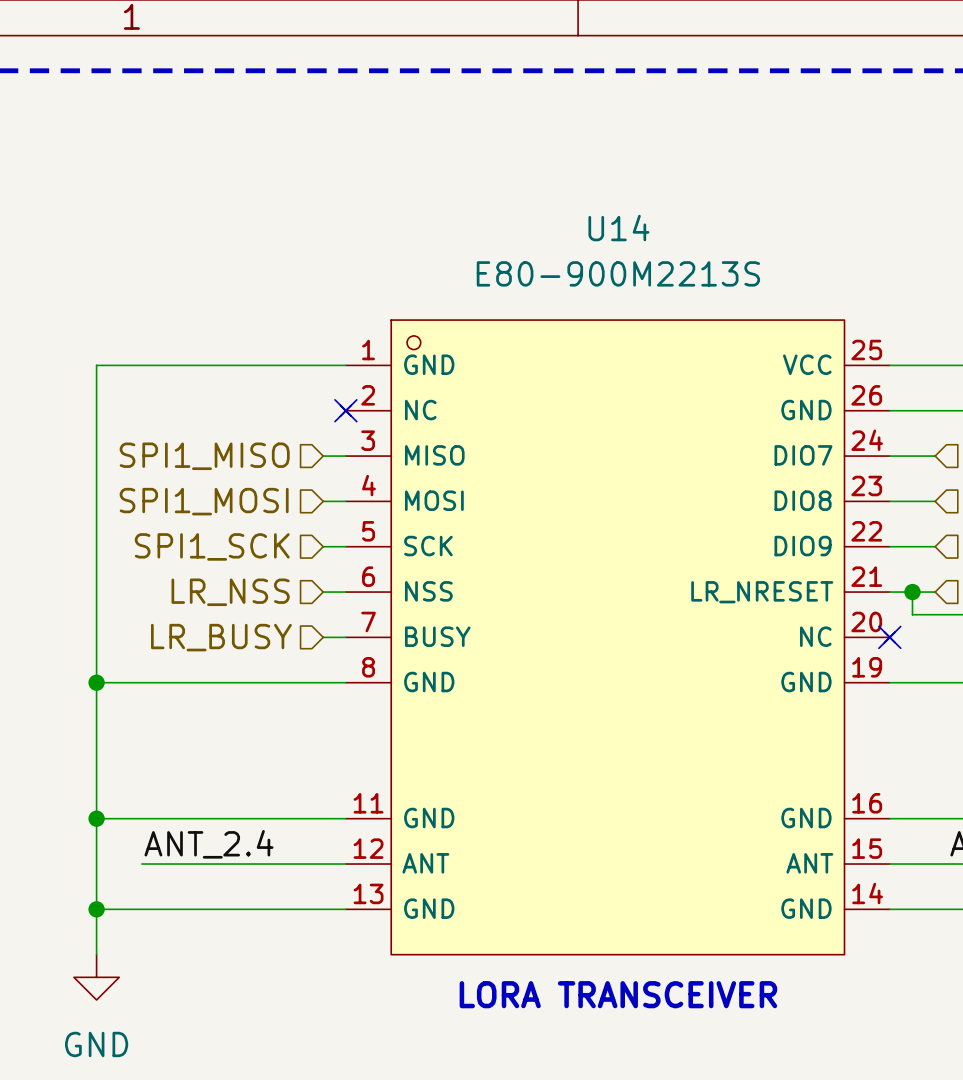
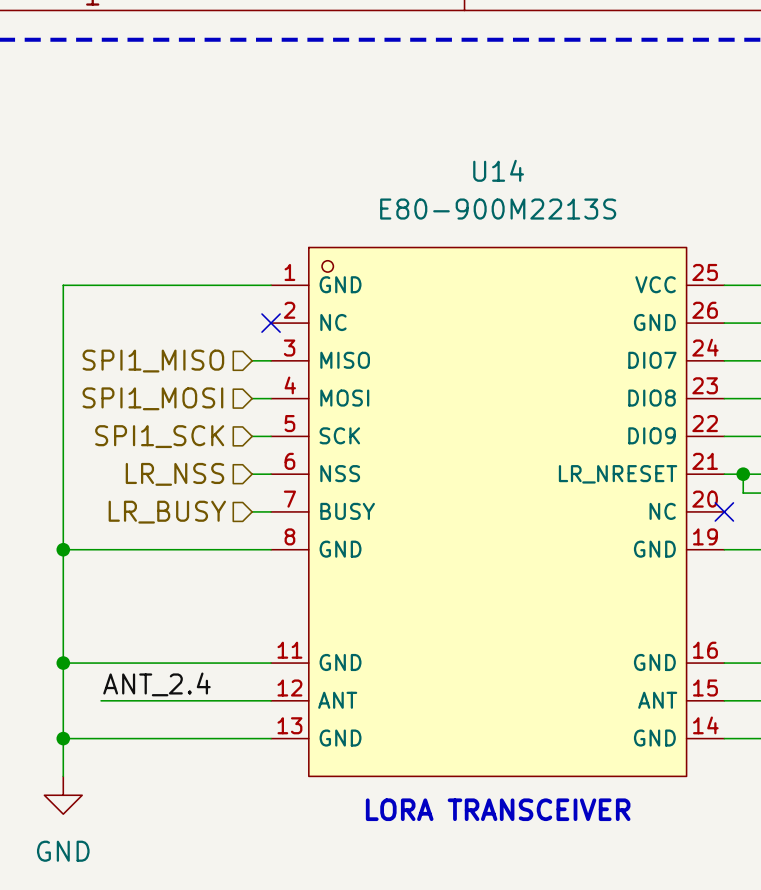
U14 symbol: [340, 320, 896, 955] -> [271, 247, 725, 777]

